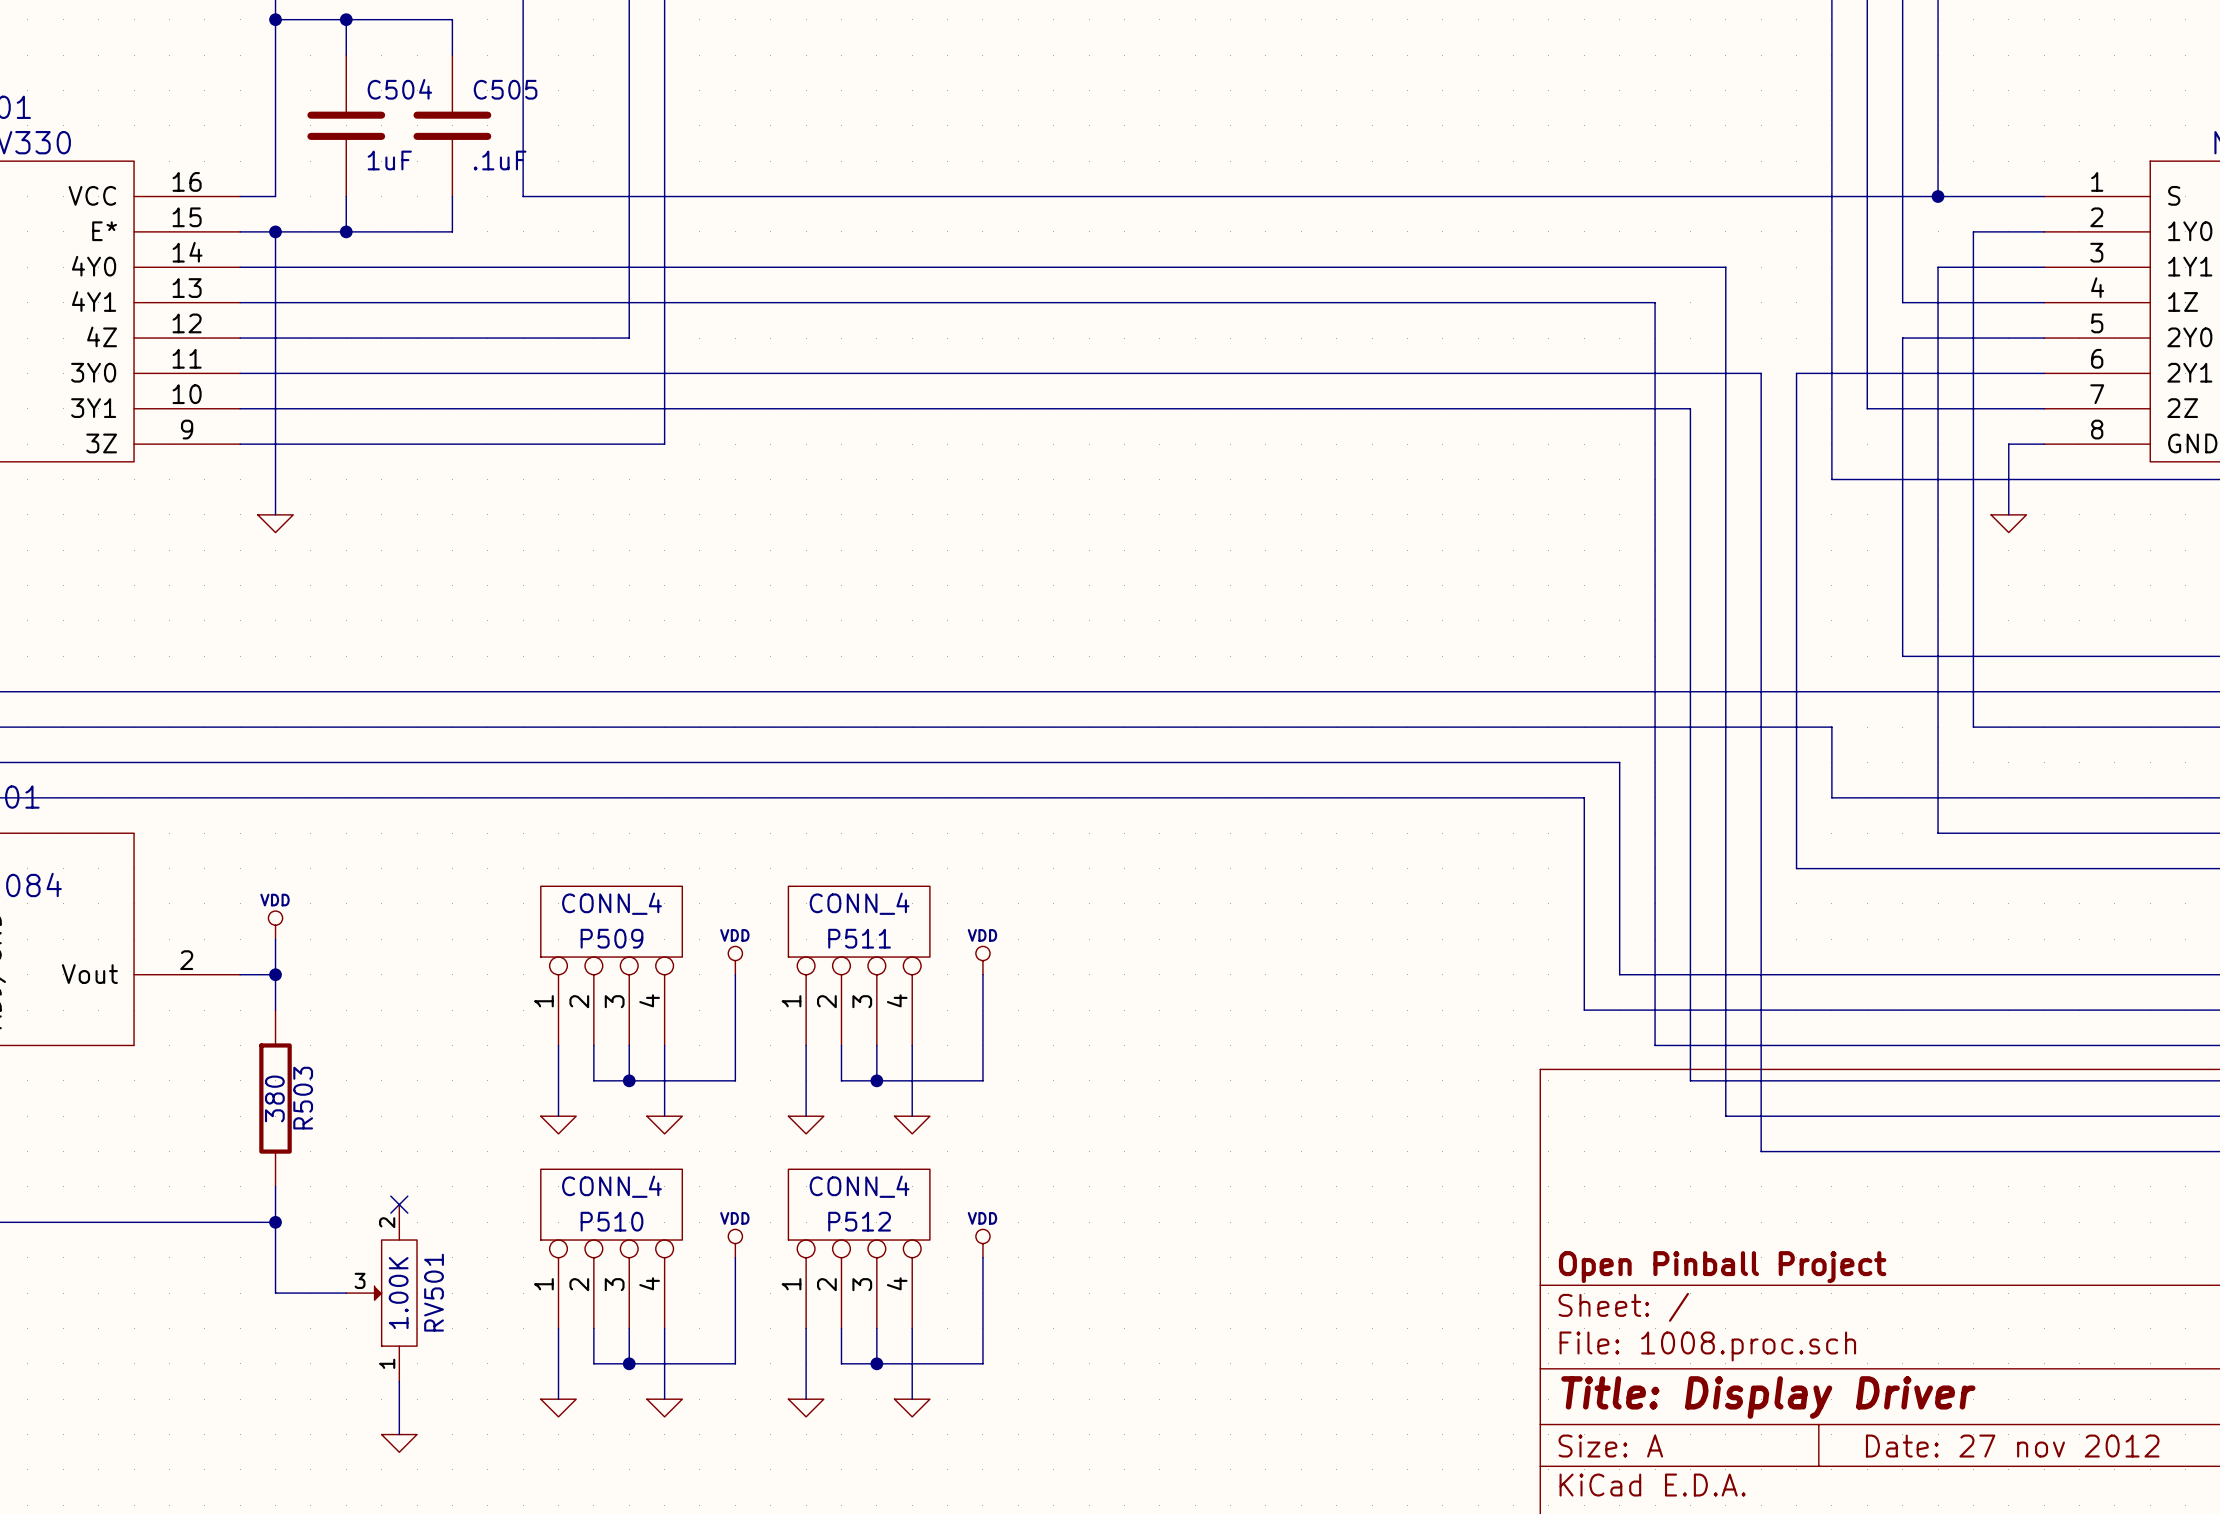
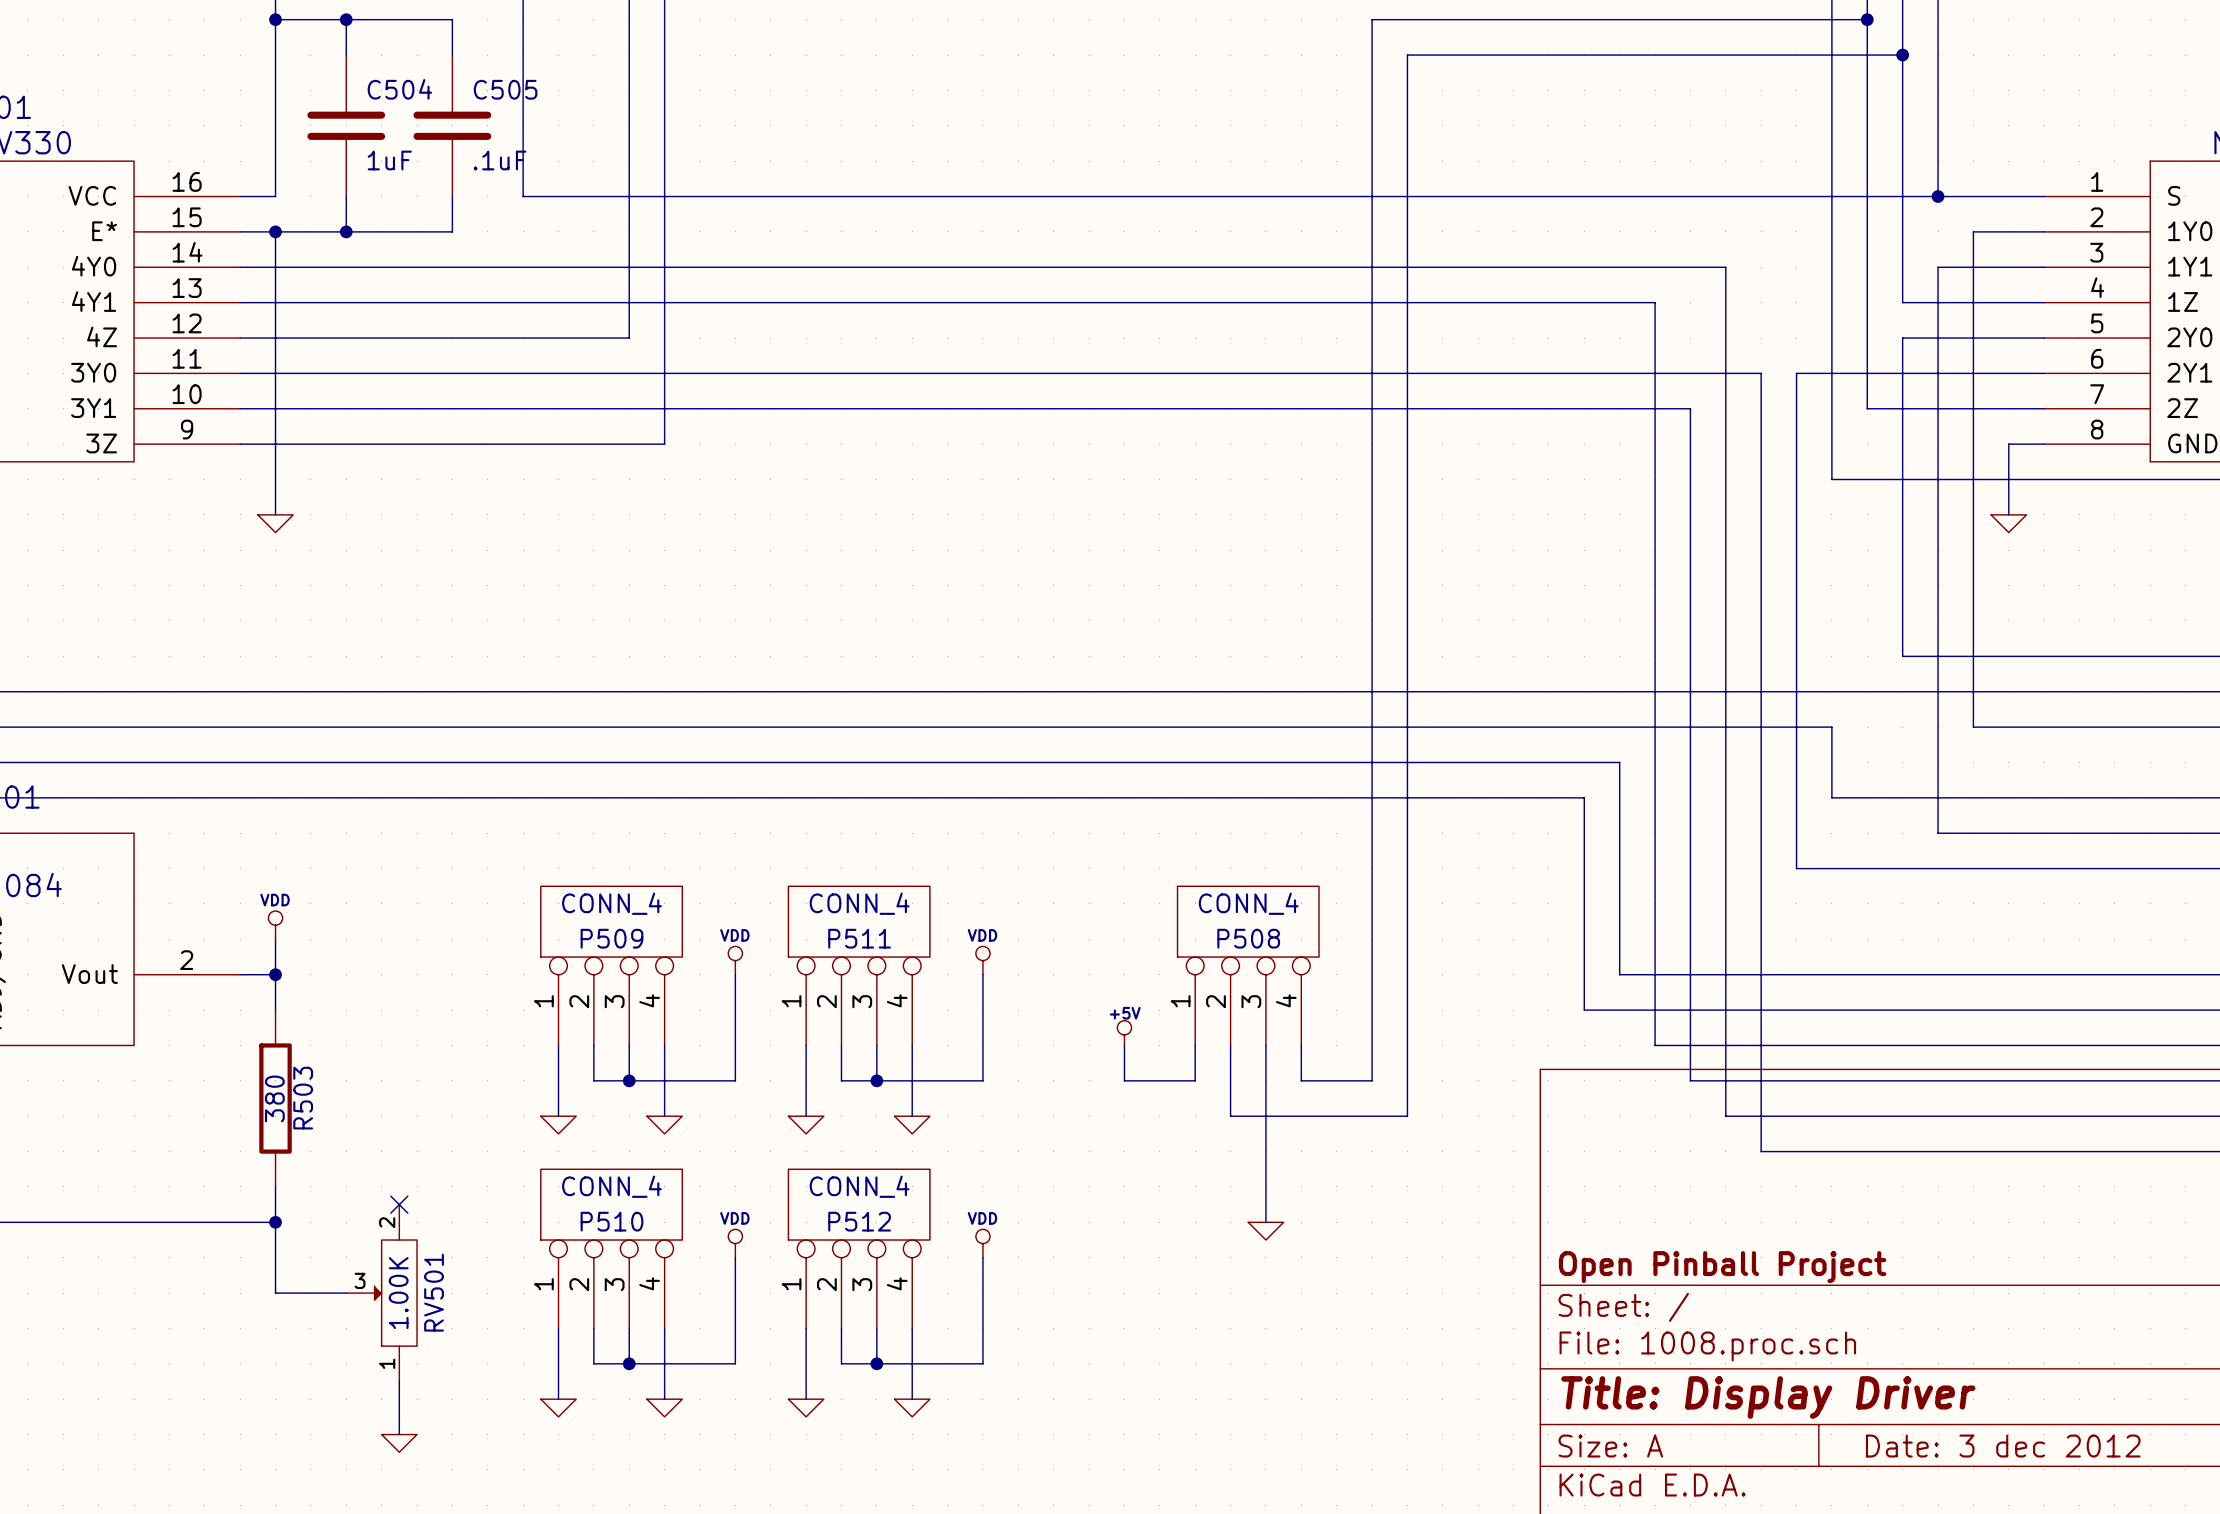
wire: none -> (1867, 19) (1372, 19) (1372, 1080) (1301, 1080) (1301, 1045)
junction: none -> (1867, 19)
wire: none -> (1902, 55) (1407, 55) (1407, 1116) (1230, 1116) (1230, 1045)
junction: none -> (1902, 55)
P508: none -> CONN_4 (1248, 965)
power symbol: none -> +5V (1124, 1033)
wire: none -> (1124, 1045) (1124, 1080) (1195, 1080) (1195, 1045)
wire: none -> (1265, 1045) (1265, 1222)
power symbol: none -> (1265, 1231)
title block: Date: 27 nov 2012 (2012, 1446) -> Date: 3 dec 2012 (2003, 1446)

